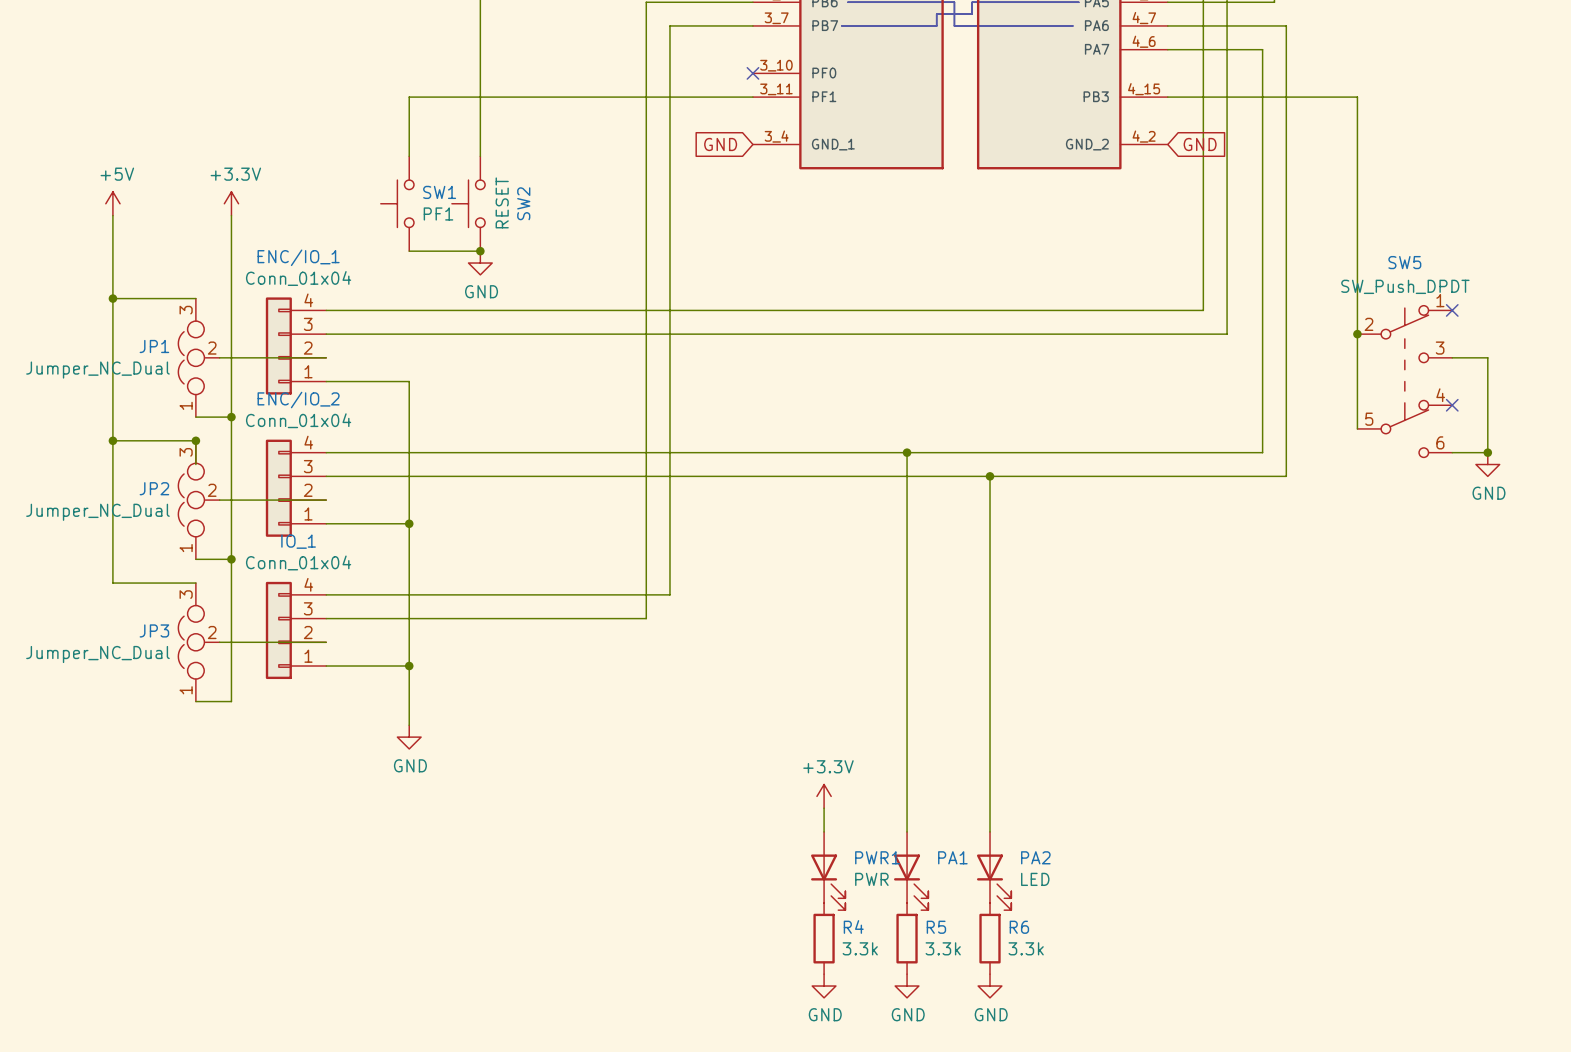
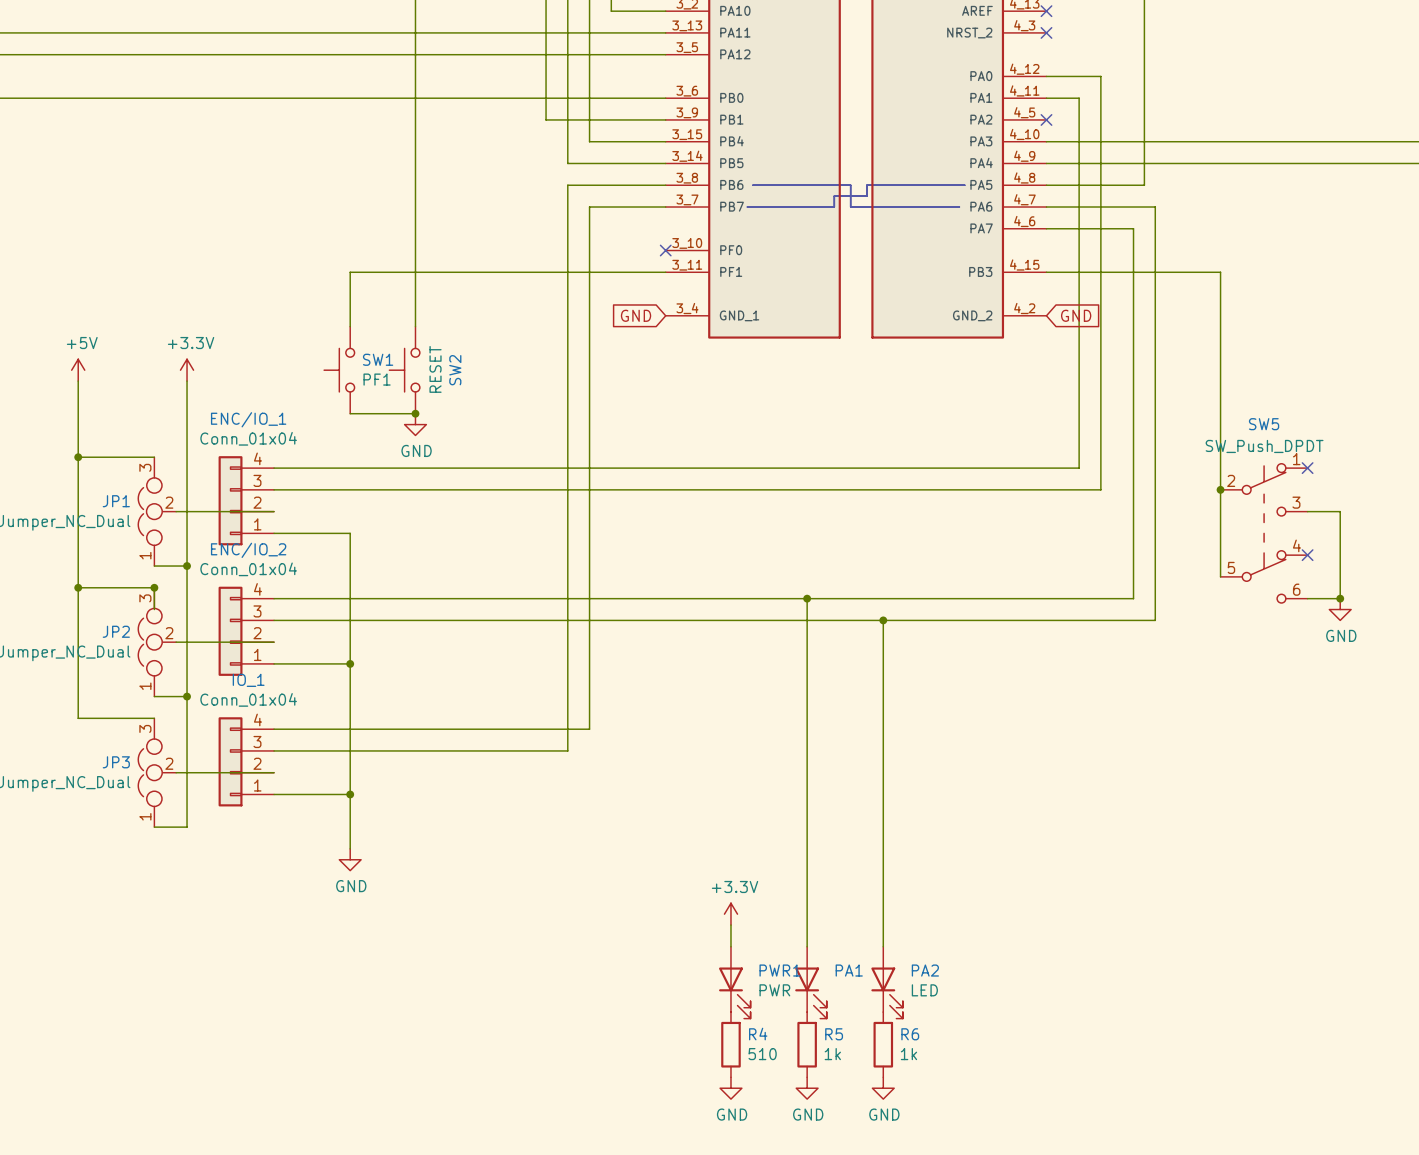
R4 value: 3.3k (860, 948) -> 510 (762, 1054)
R5 value: 3.3k (943, 948) -> 1k (832, 1054)
R6 value: 3.3k (1026, 948) -> 1k (908, 1054)

